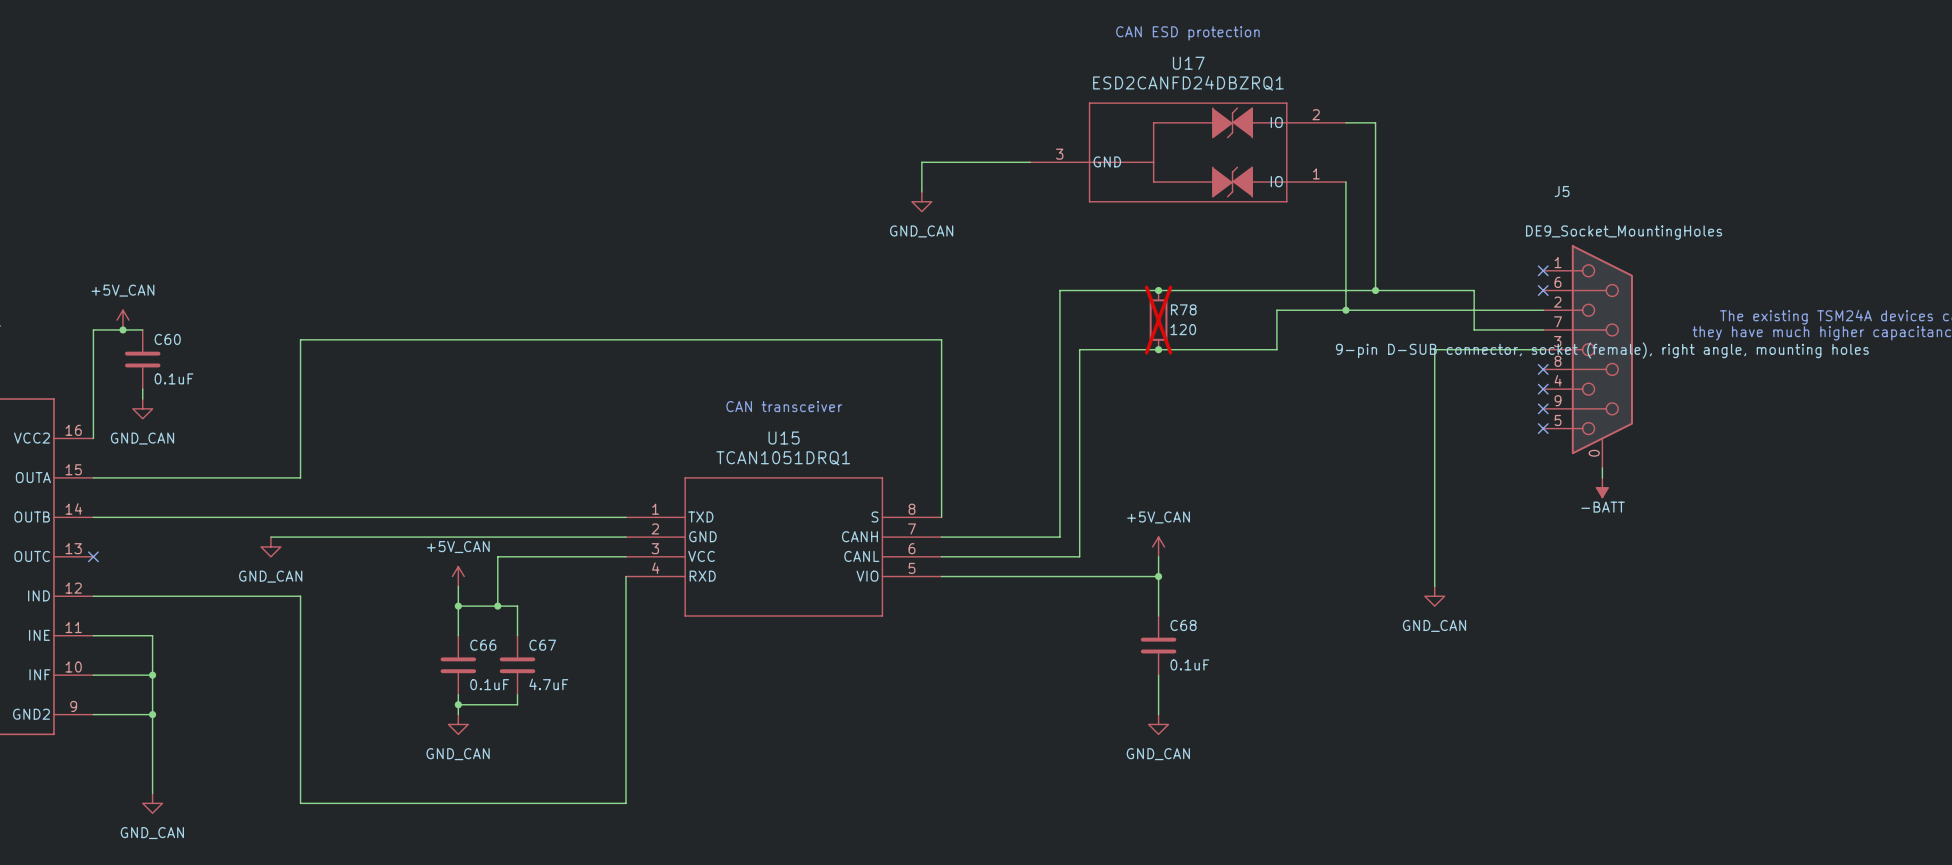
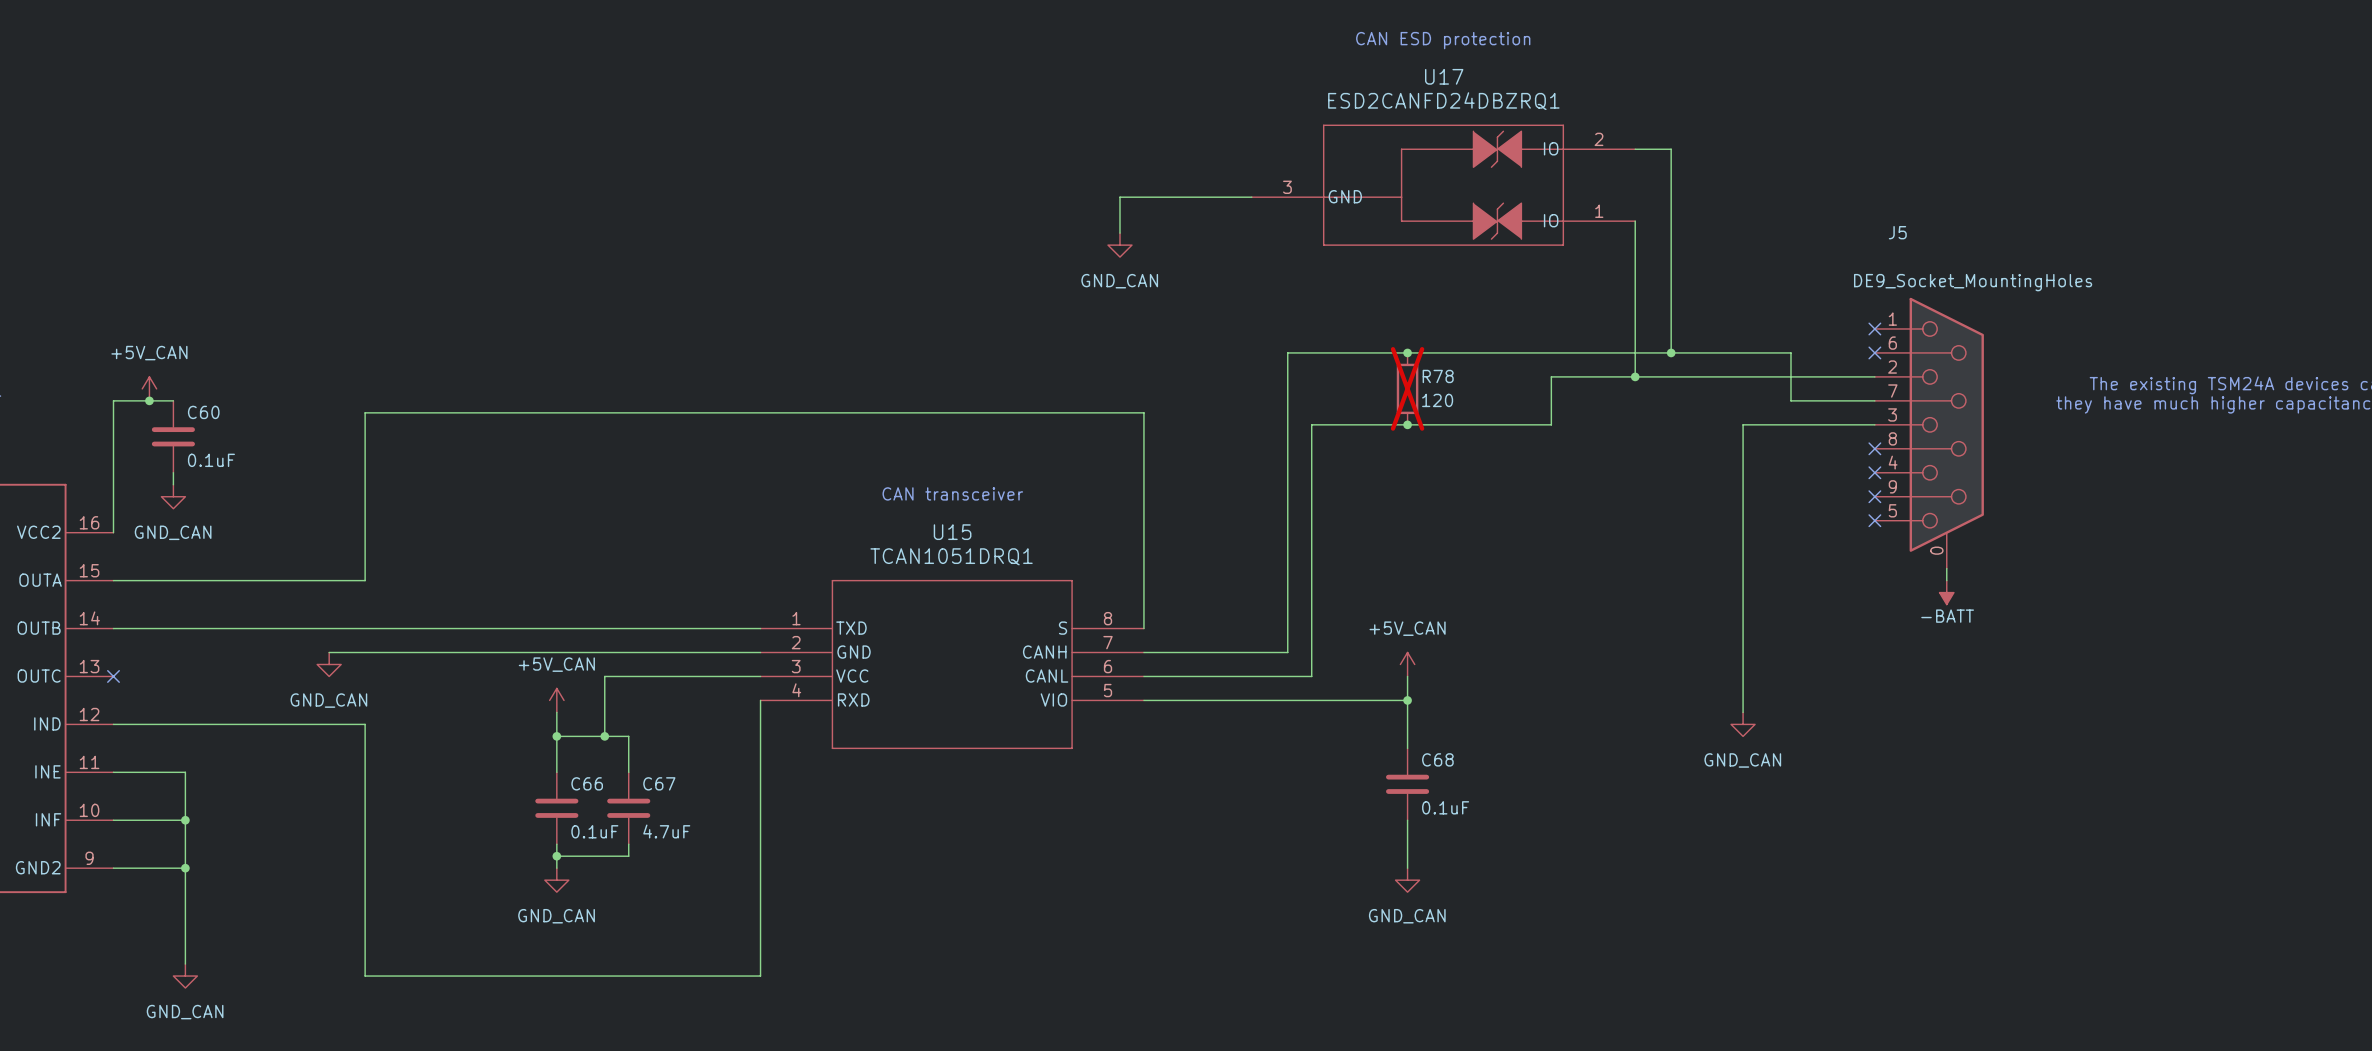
J5 text: 9-pin D-SUB connector, socket (female), right angle, mounting holes (1602, 350) -> none

